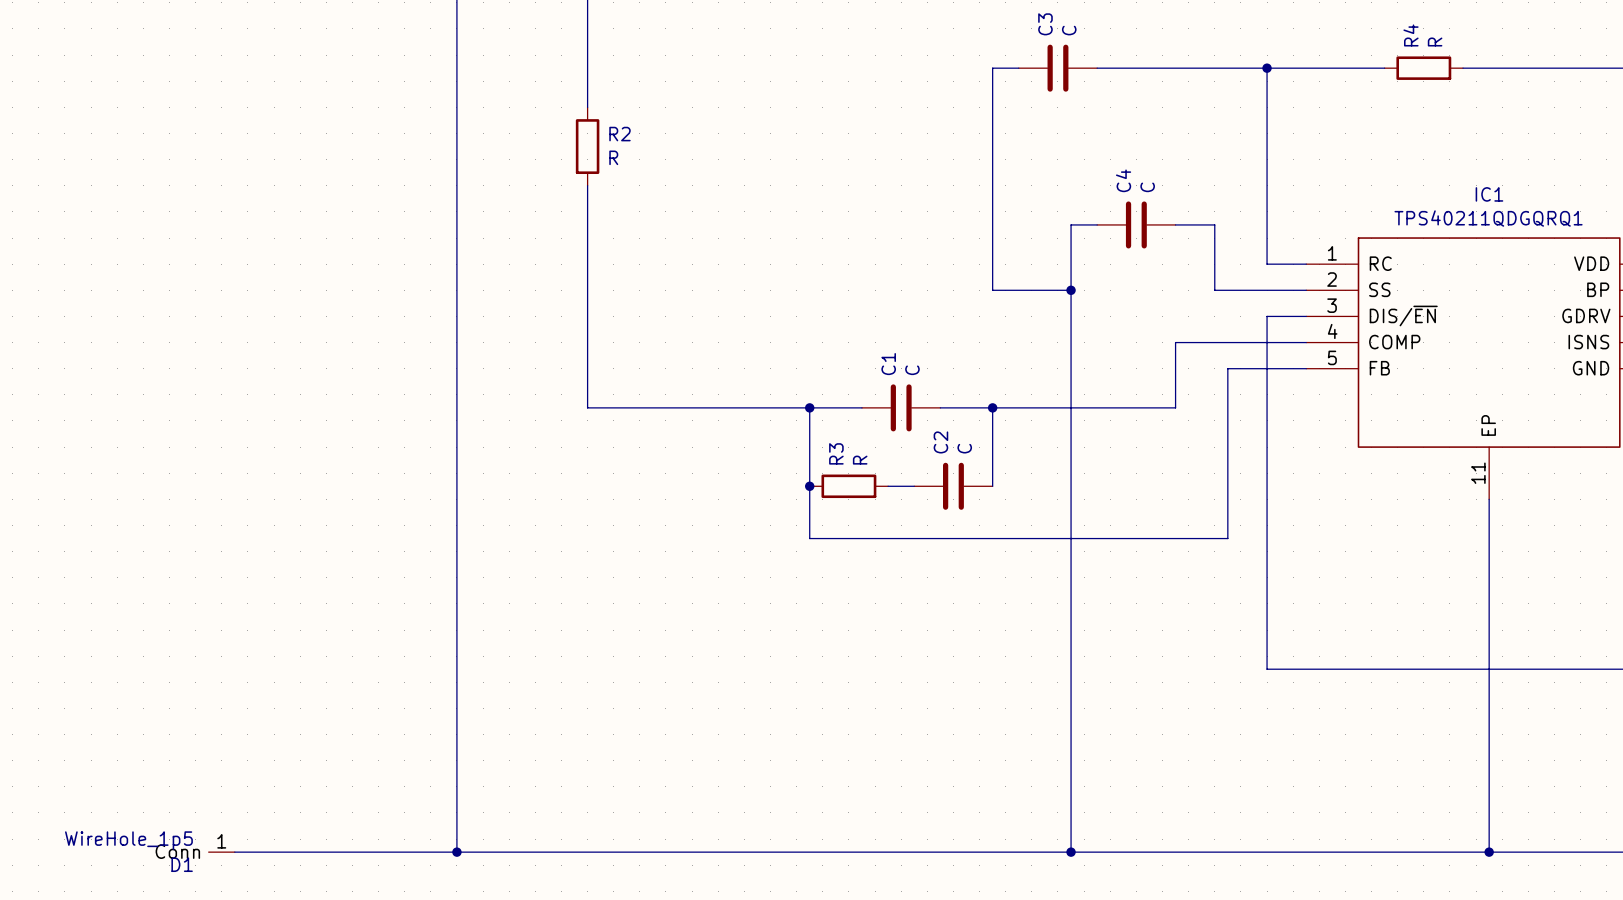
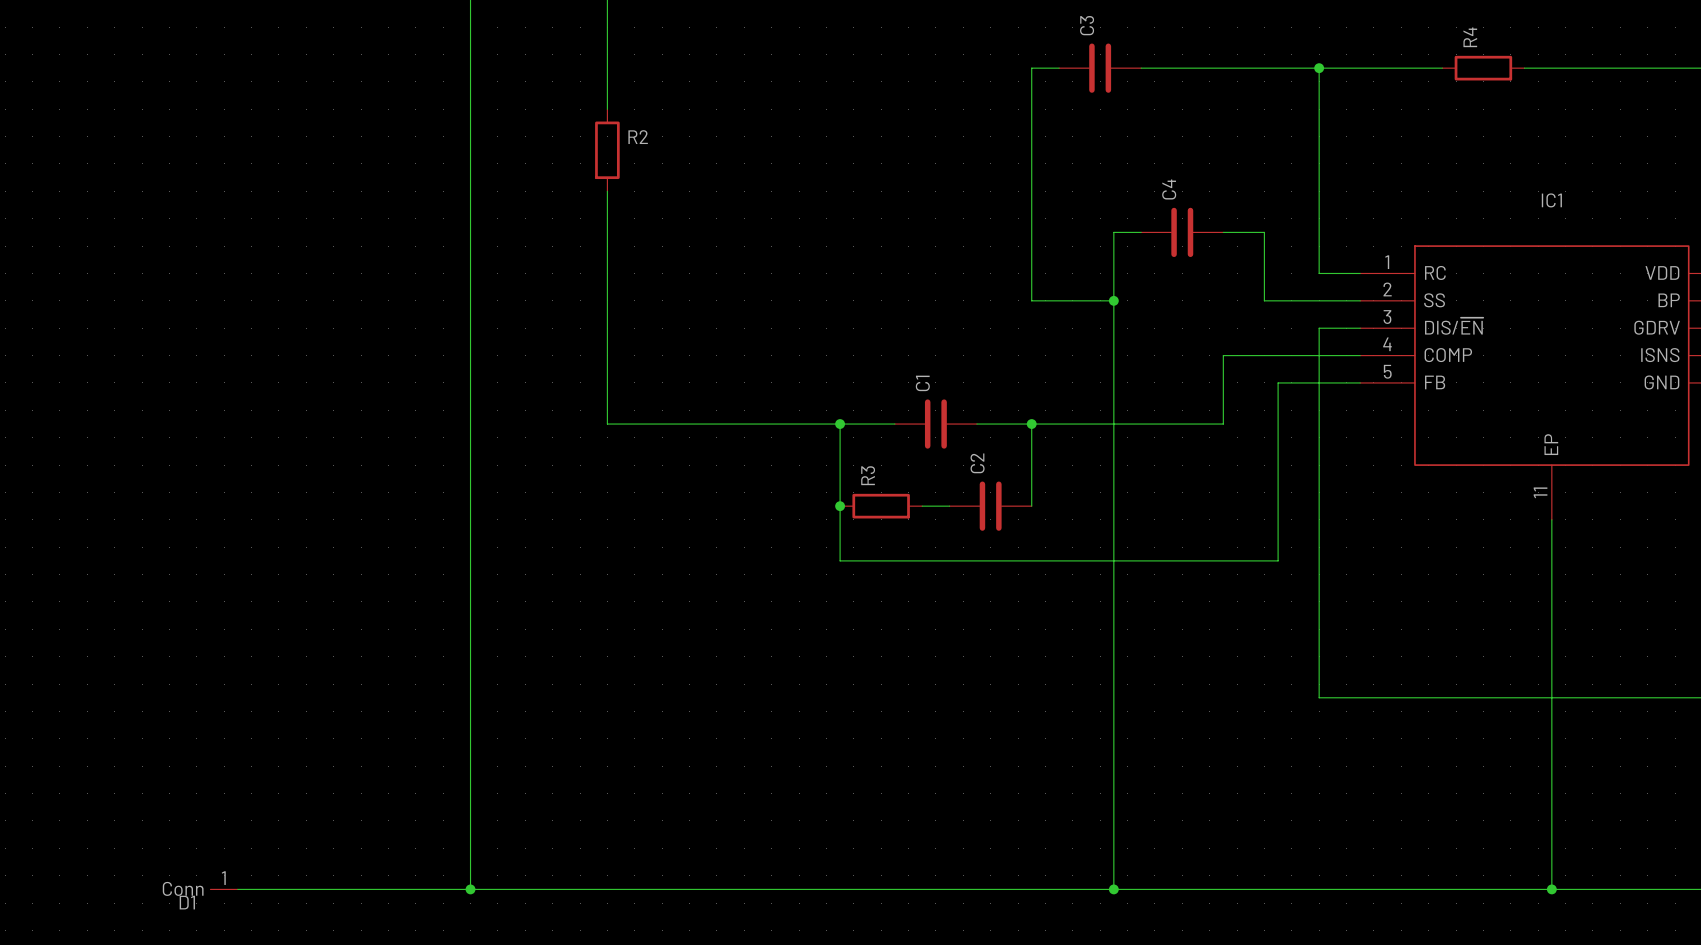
C3 value: C (1069, 30) -> none
R4 value: R (1435, 42) -> none
R2 value: R (613, 157) -> none
C4 value: C (1147, 187) -> none
IC1 value: TPS40211QDGQRQ1 (1488, 218) -> none
C1 value: C (912, 370) -> none
C2 value: C (964, 448) -> none
R3 value: R (860, 460) -> none
D1 value: WireHole_1p5 (128, 840) -> none

